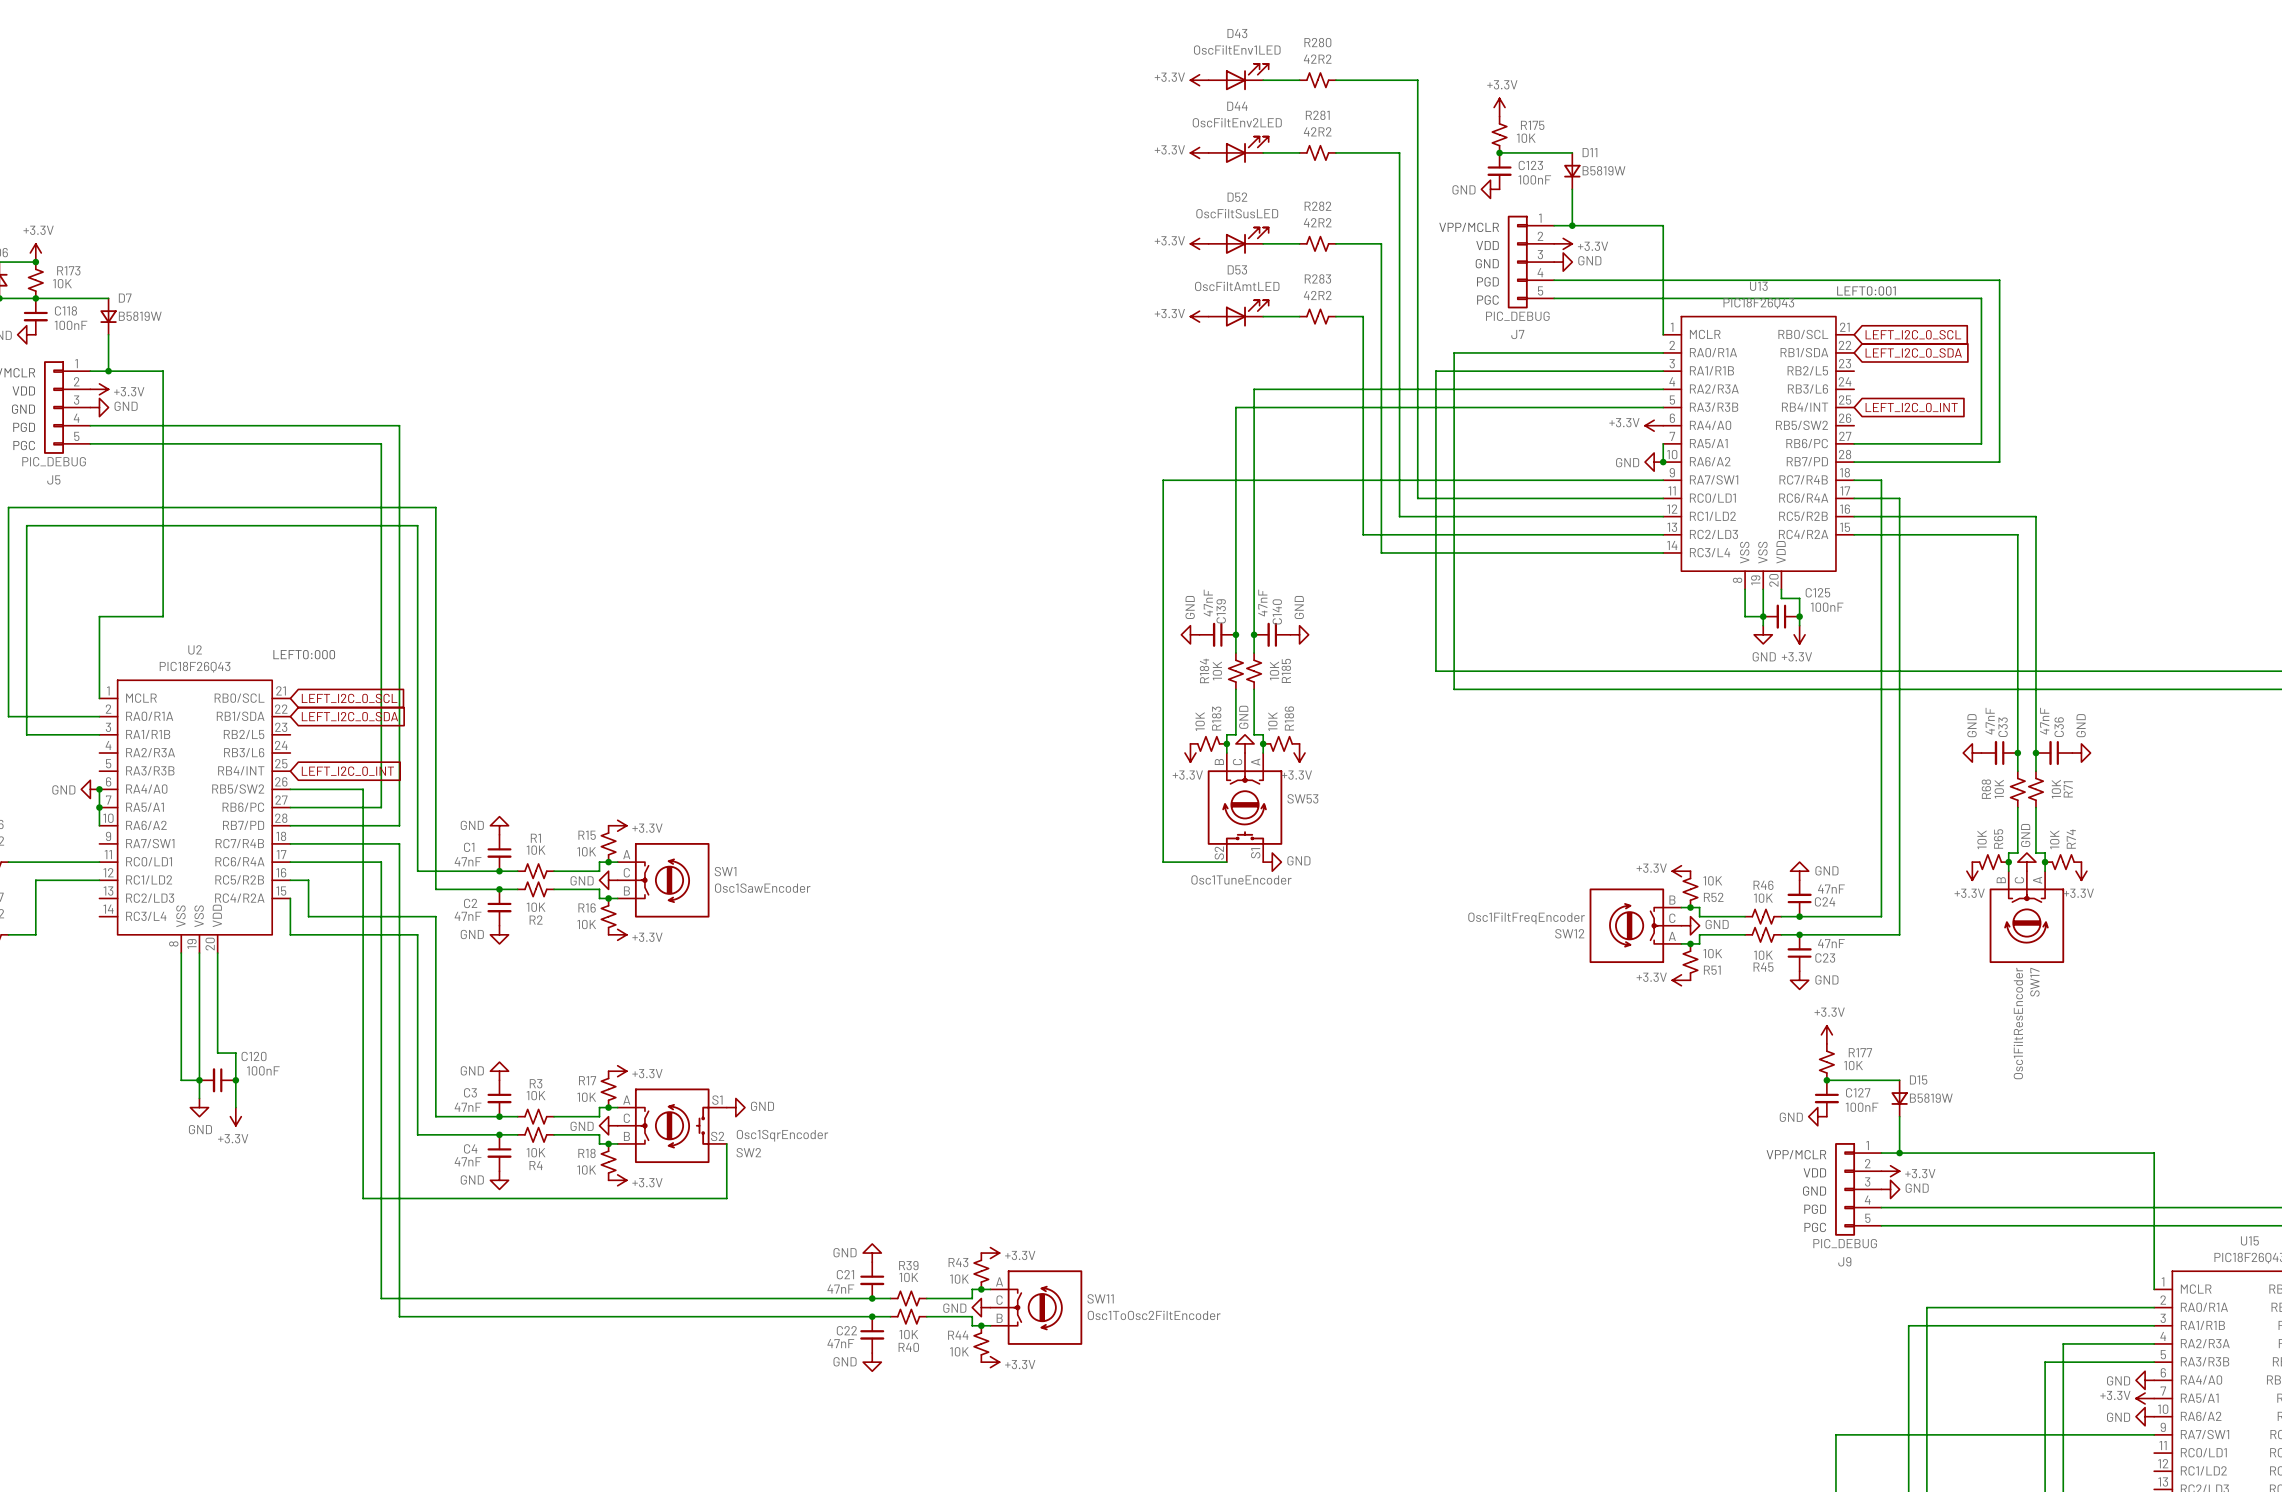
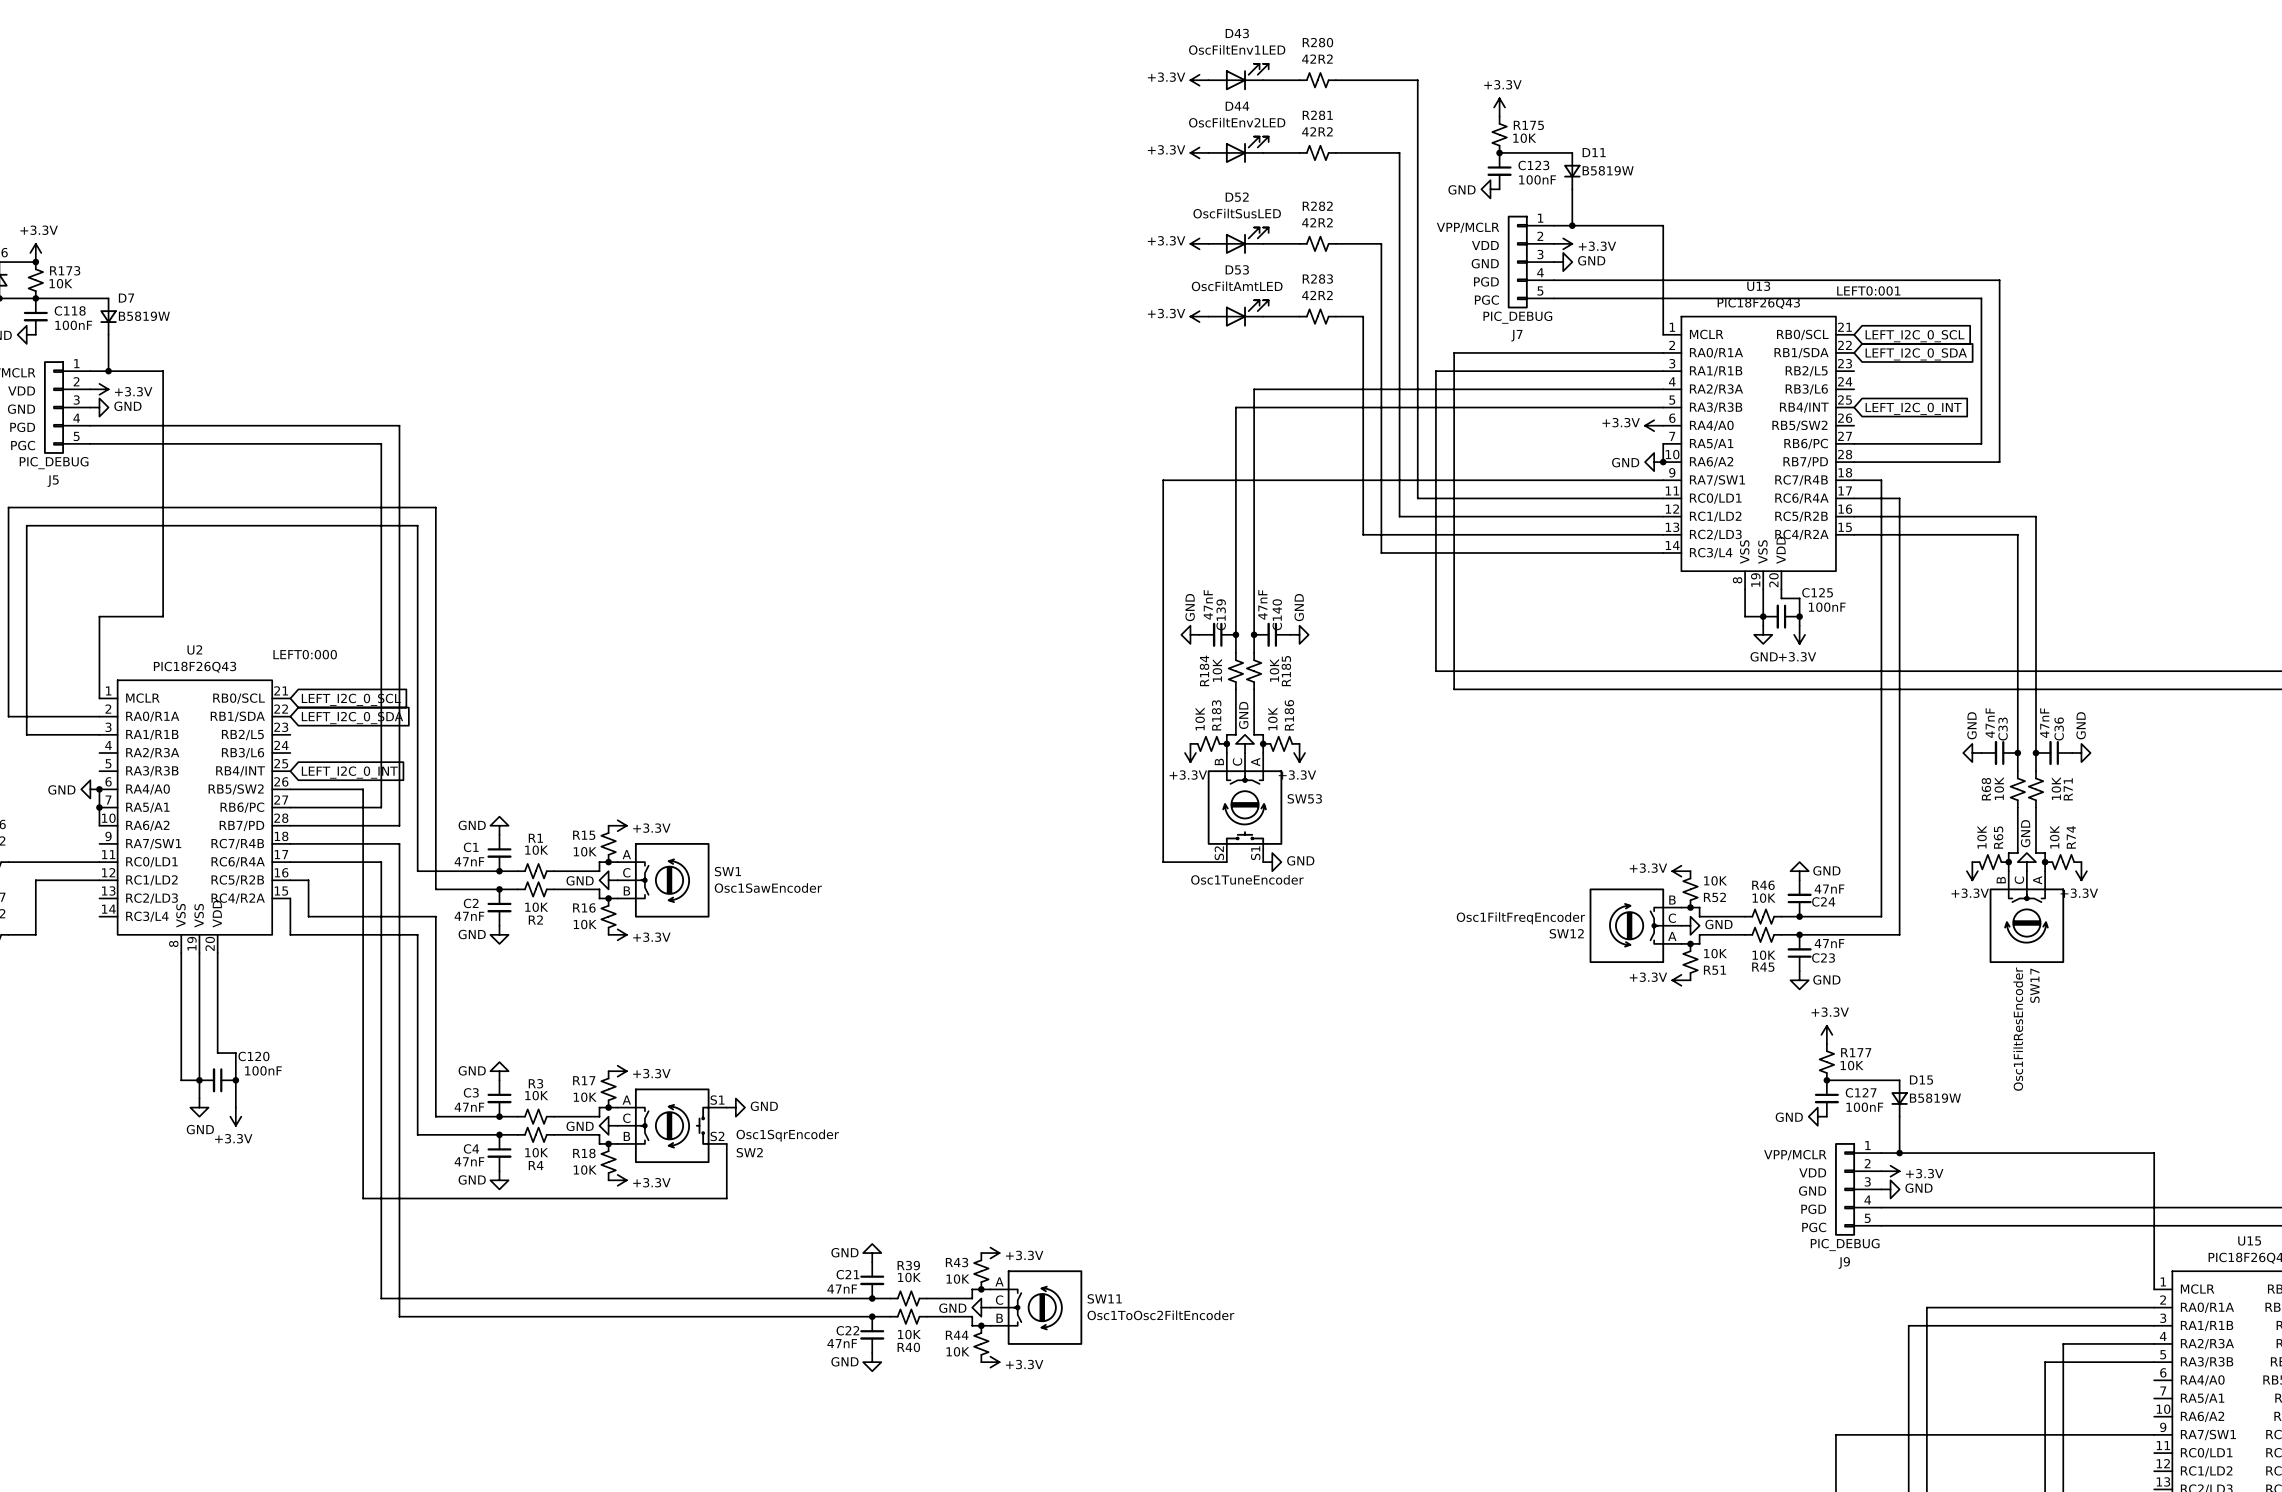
power symbol: GND (2145, 1380) -> none
power symbol: +3.3V (2145, 1398) -> none
power symbol: GND (2145, 1416) -> none

